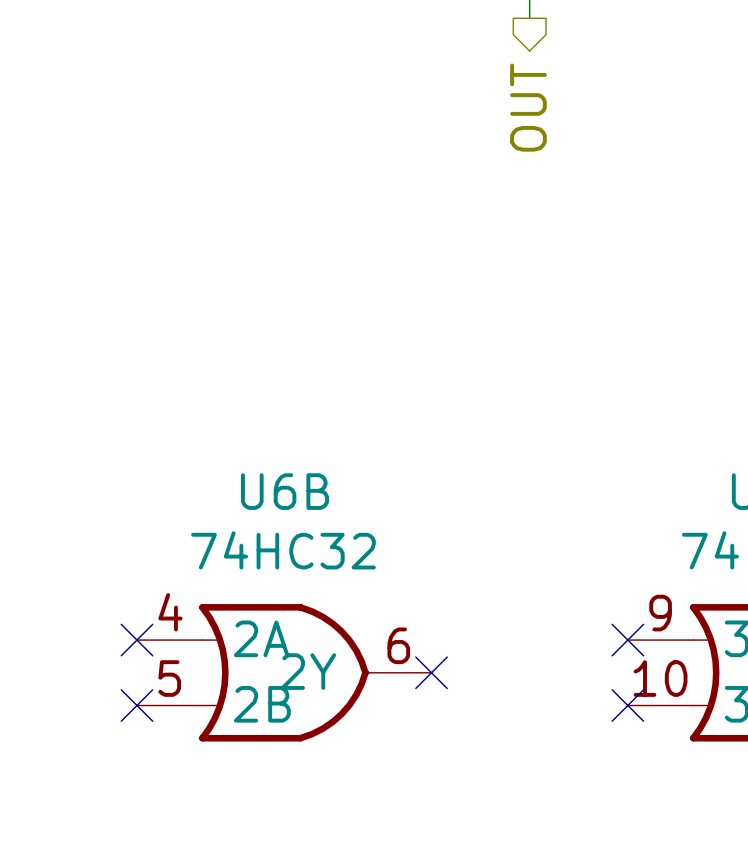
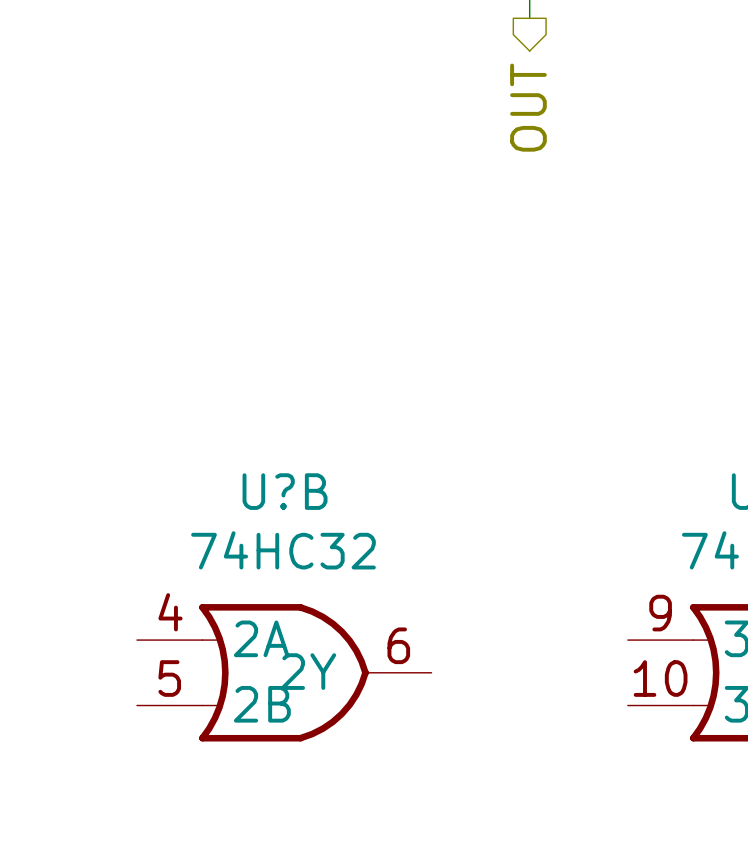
U6B name: U6B (285, 491) -> U?B (285, 491)
no-connect mark: (136, 640) -> none
no-connect mark: (627, 640) -> none
no-connect mark: (431, 672) -> none
no-connect mark: (136, 705) -> none
no-connect mark: (627, 705) -> none

